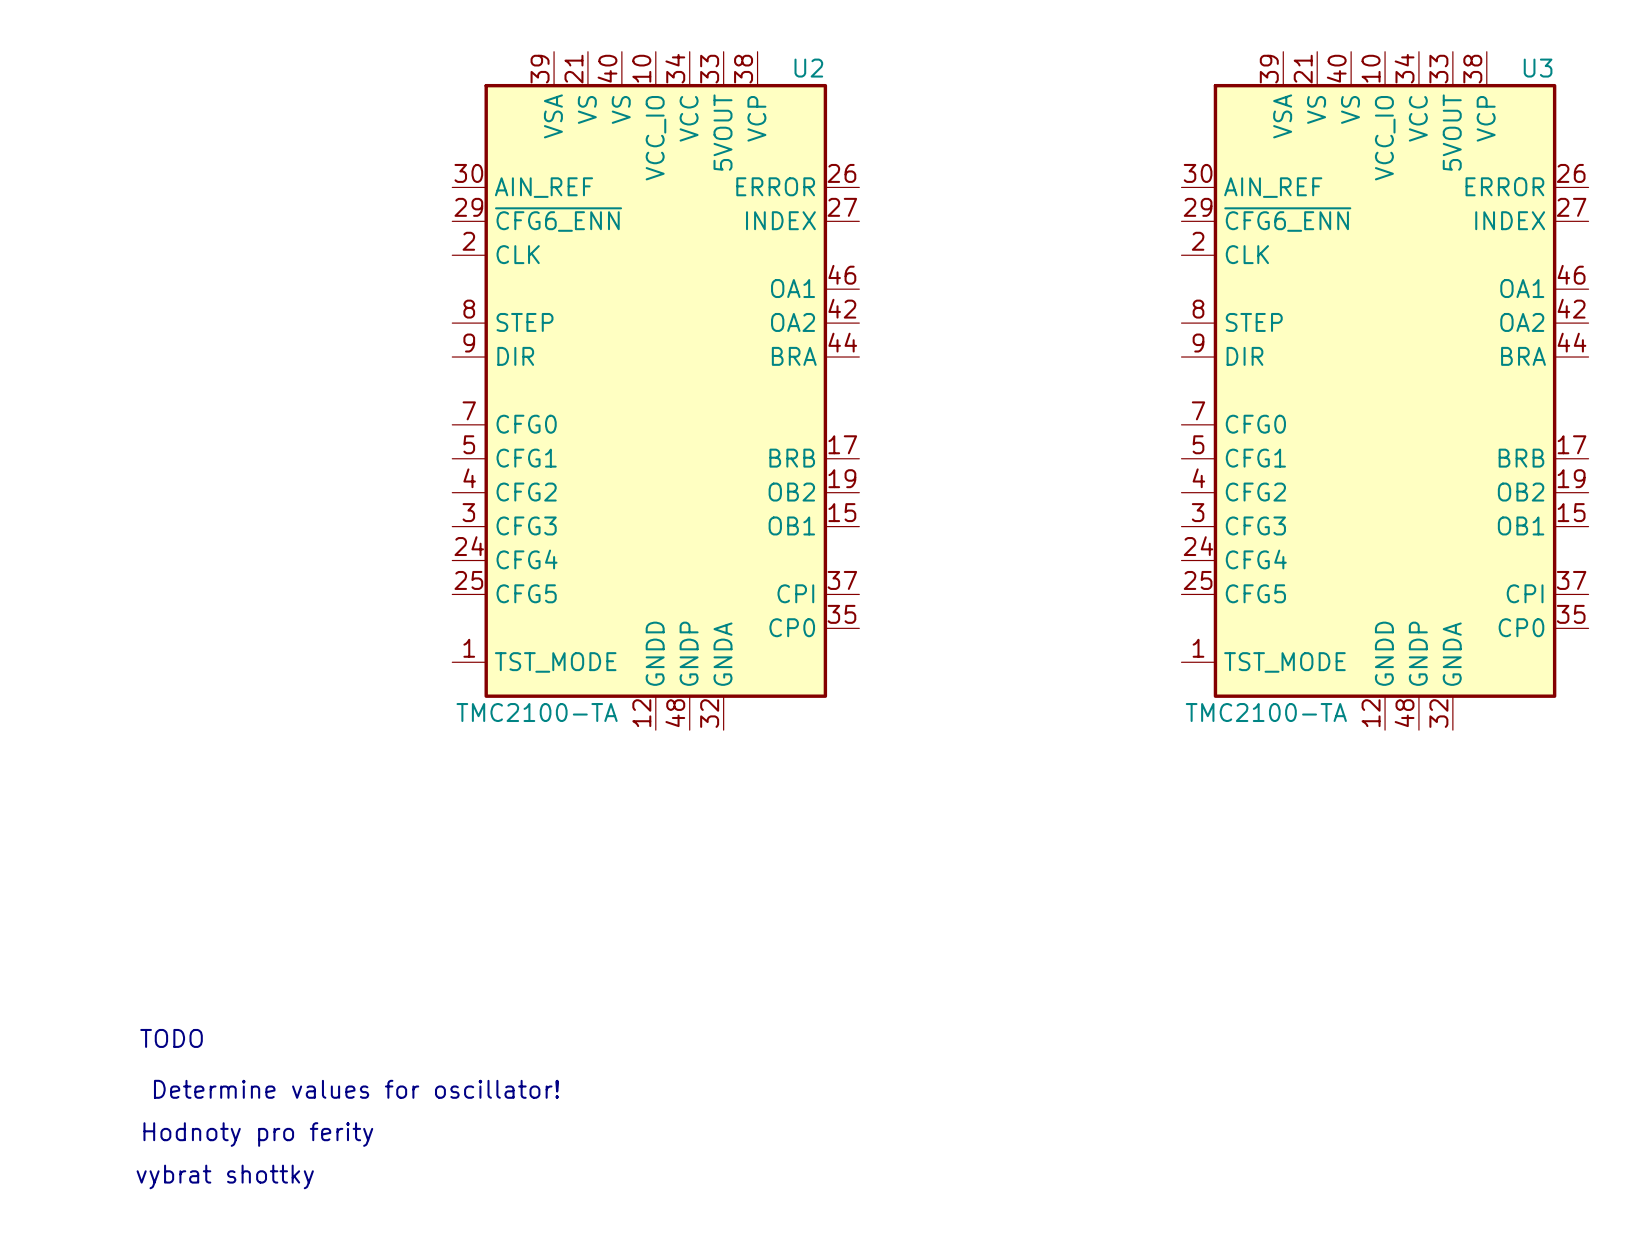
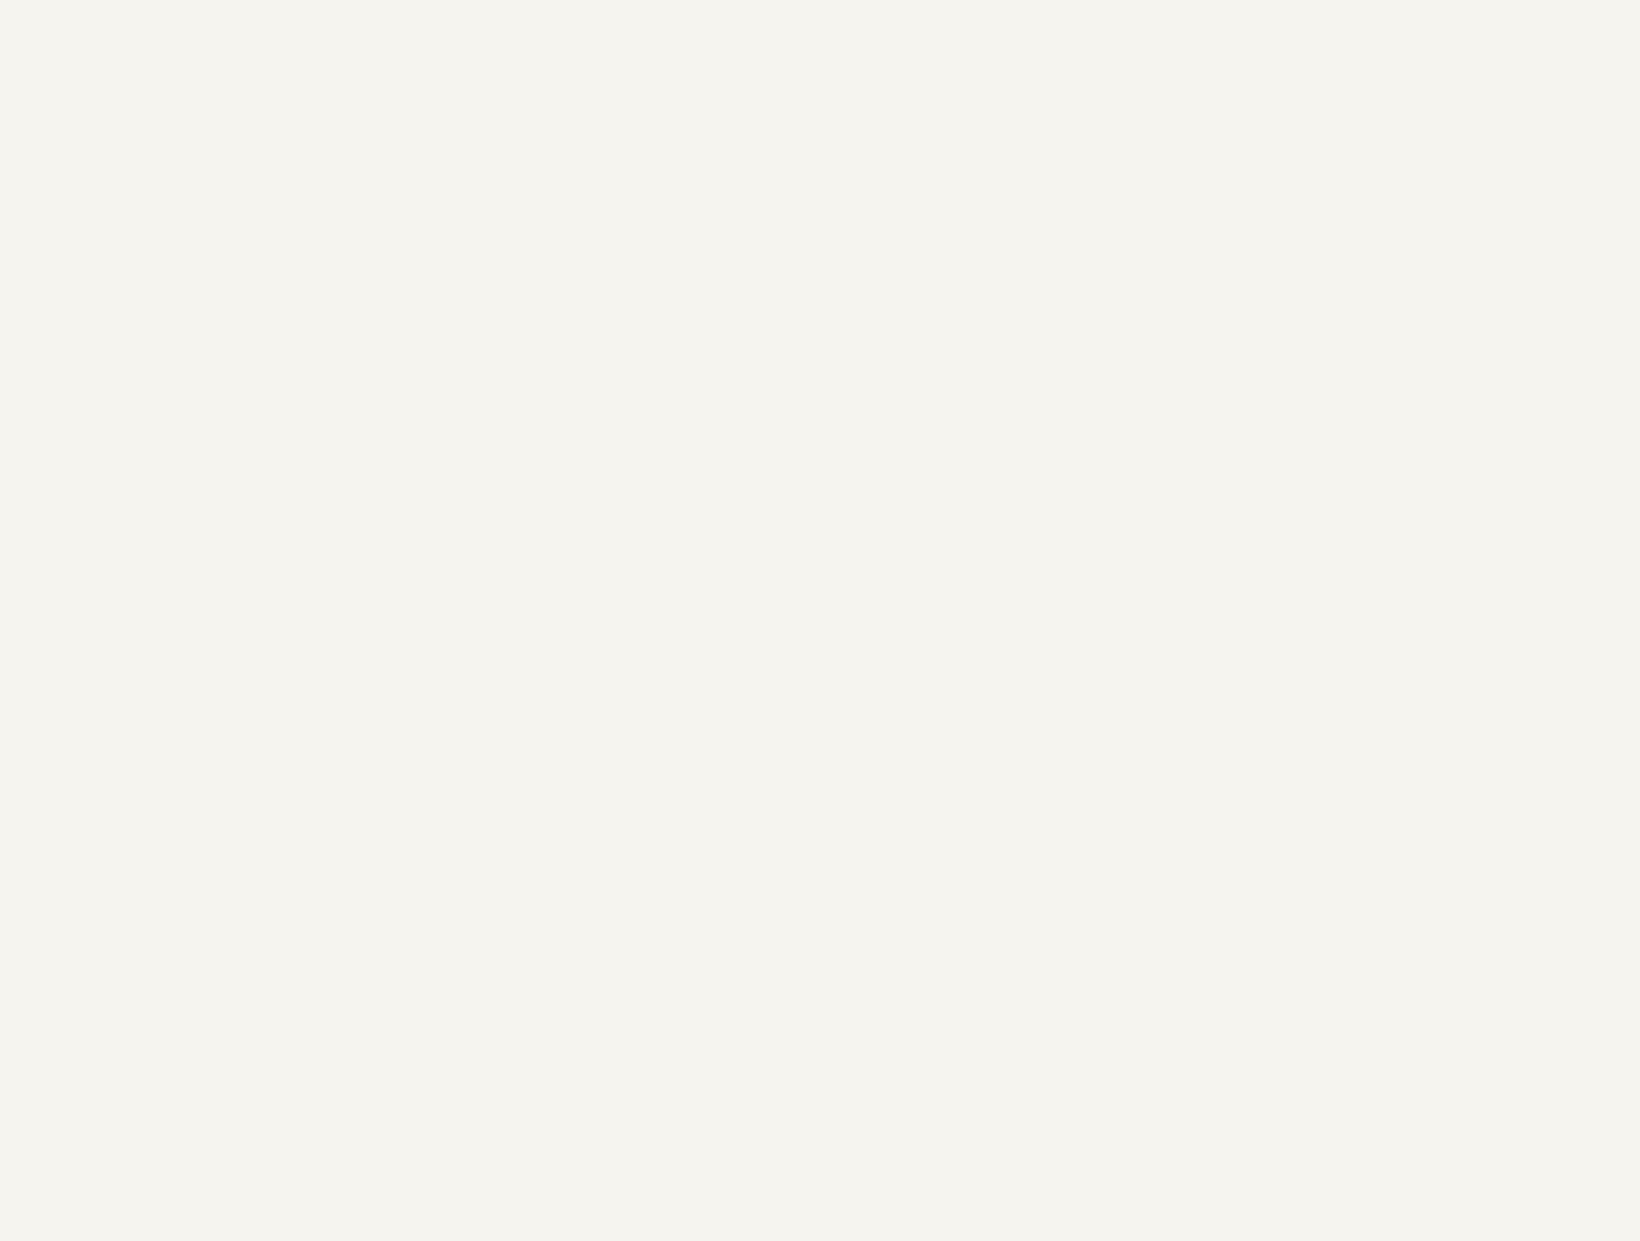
U2: TMC2100-TA (655, 390) -> none
U3: TMC2100-TA (1385, 390) -> none
text: TODO (171, 1038) -> none
text: Determine values for oscillator! (356, 1089) -> none
text: Hodnoty pro ferity (258, 1134) -> none
text: vybrat shottky (225, 1176) -> none

